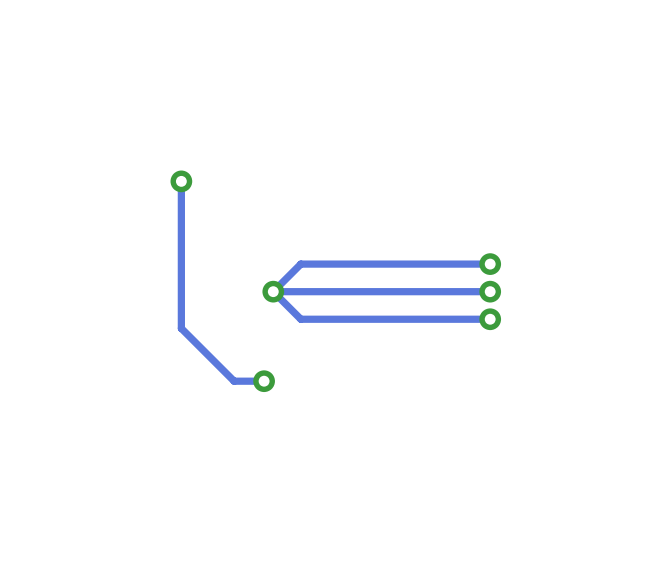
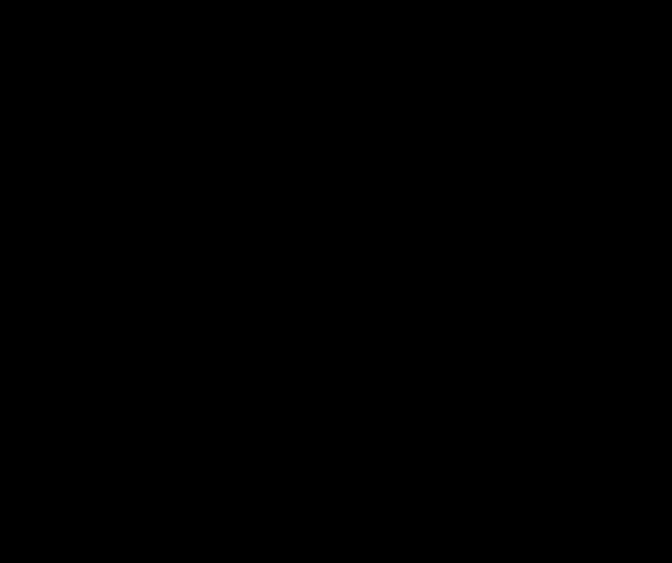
track: (181, 181) (181, 328) (234, 381) (264, 381) -> none
via: (181, 181) -> none
track: (490, 264) (300, 264) (273, 291) -> none
via: (490, 264) -> none
track: (273, 291) (300, 319) (490, 319) -> none
via: (273, 291) -> none
track: (490, 291) (273, 291) -> none
via: (490, 291) -> none
via: (490, 319) -> none
via: (264, 381) -> none

